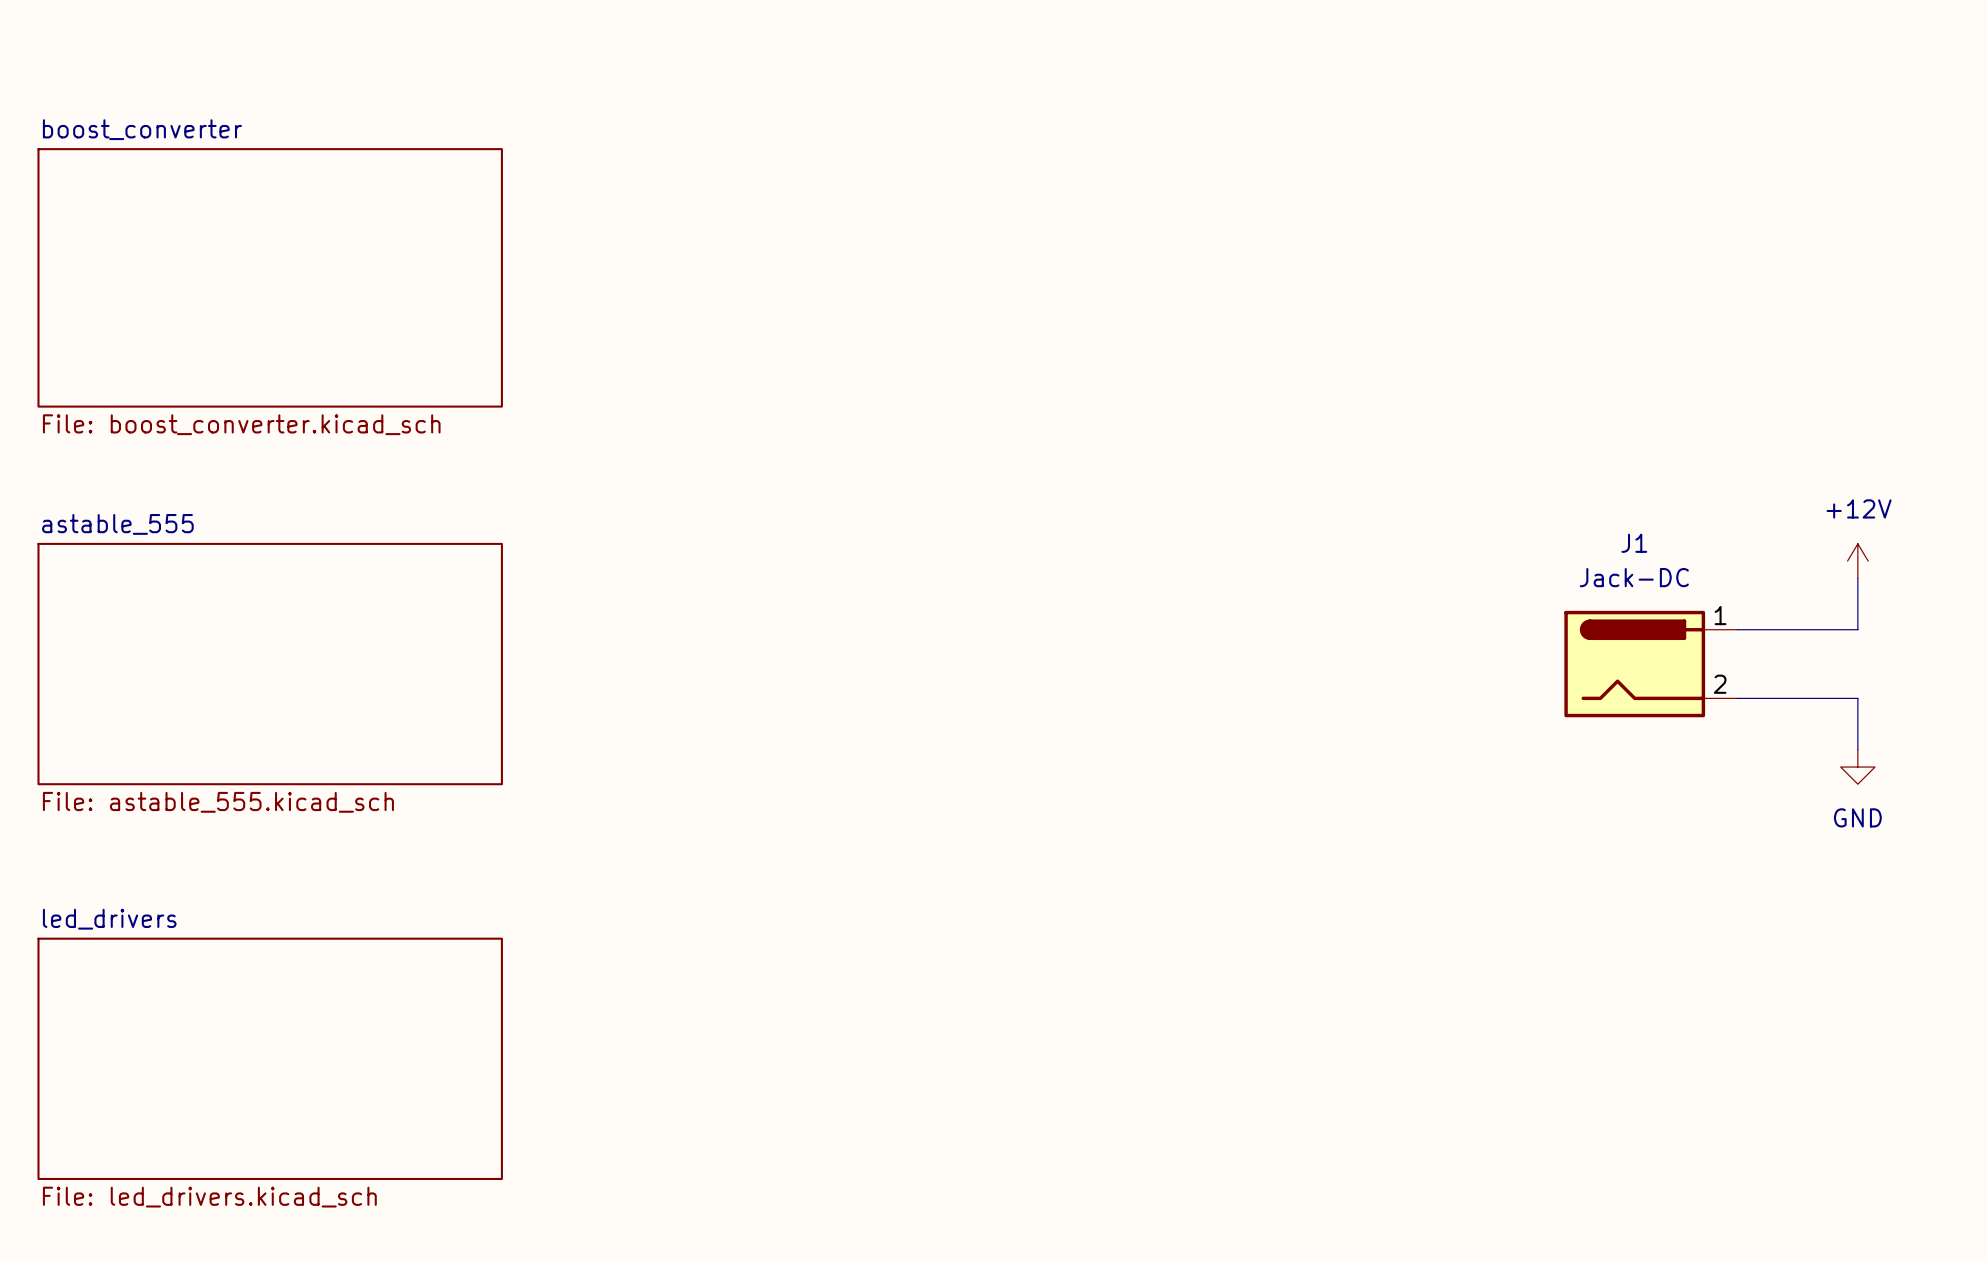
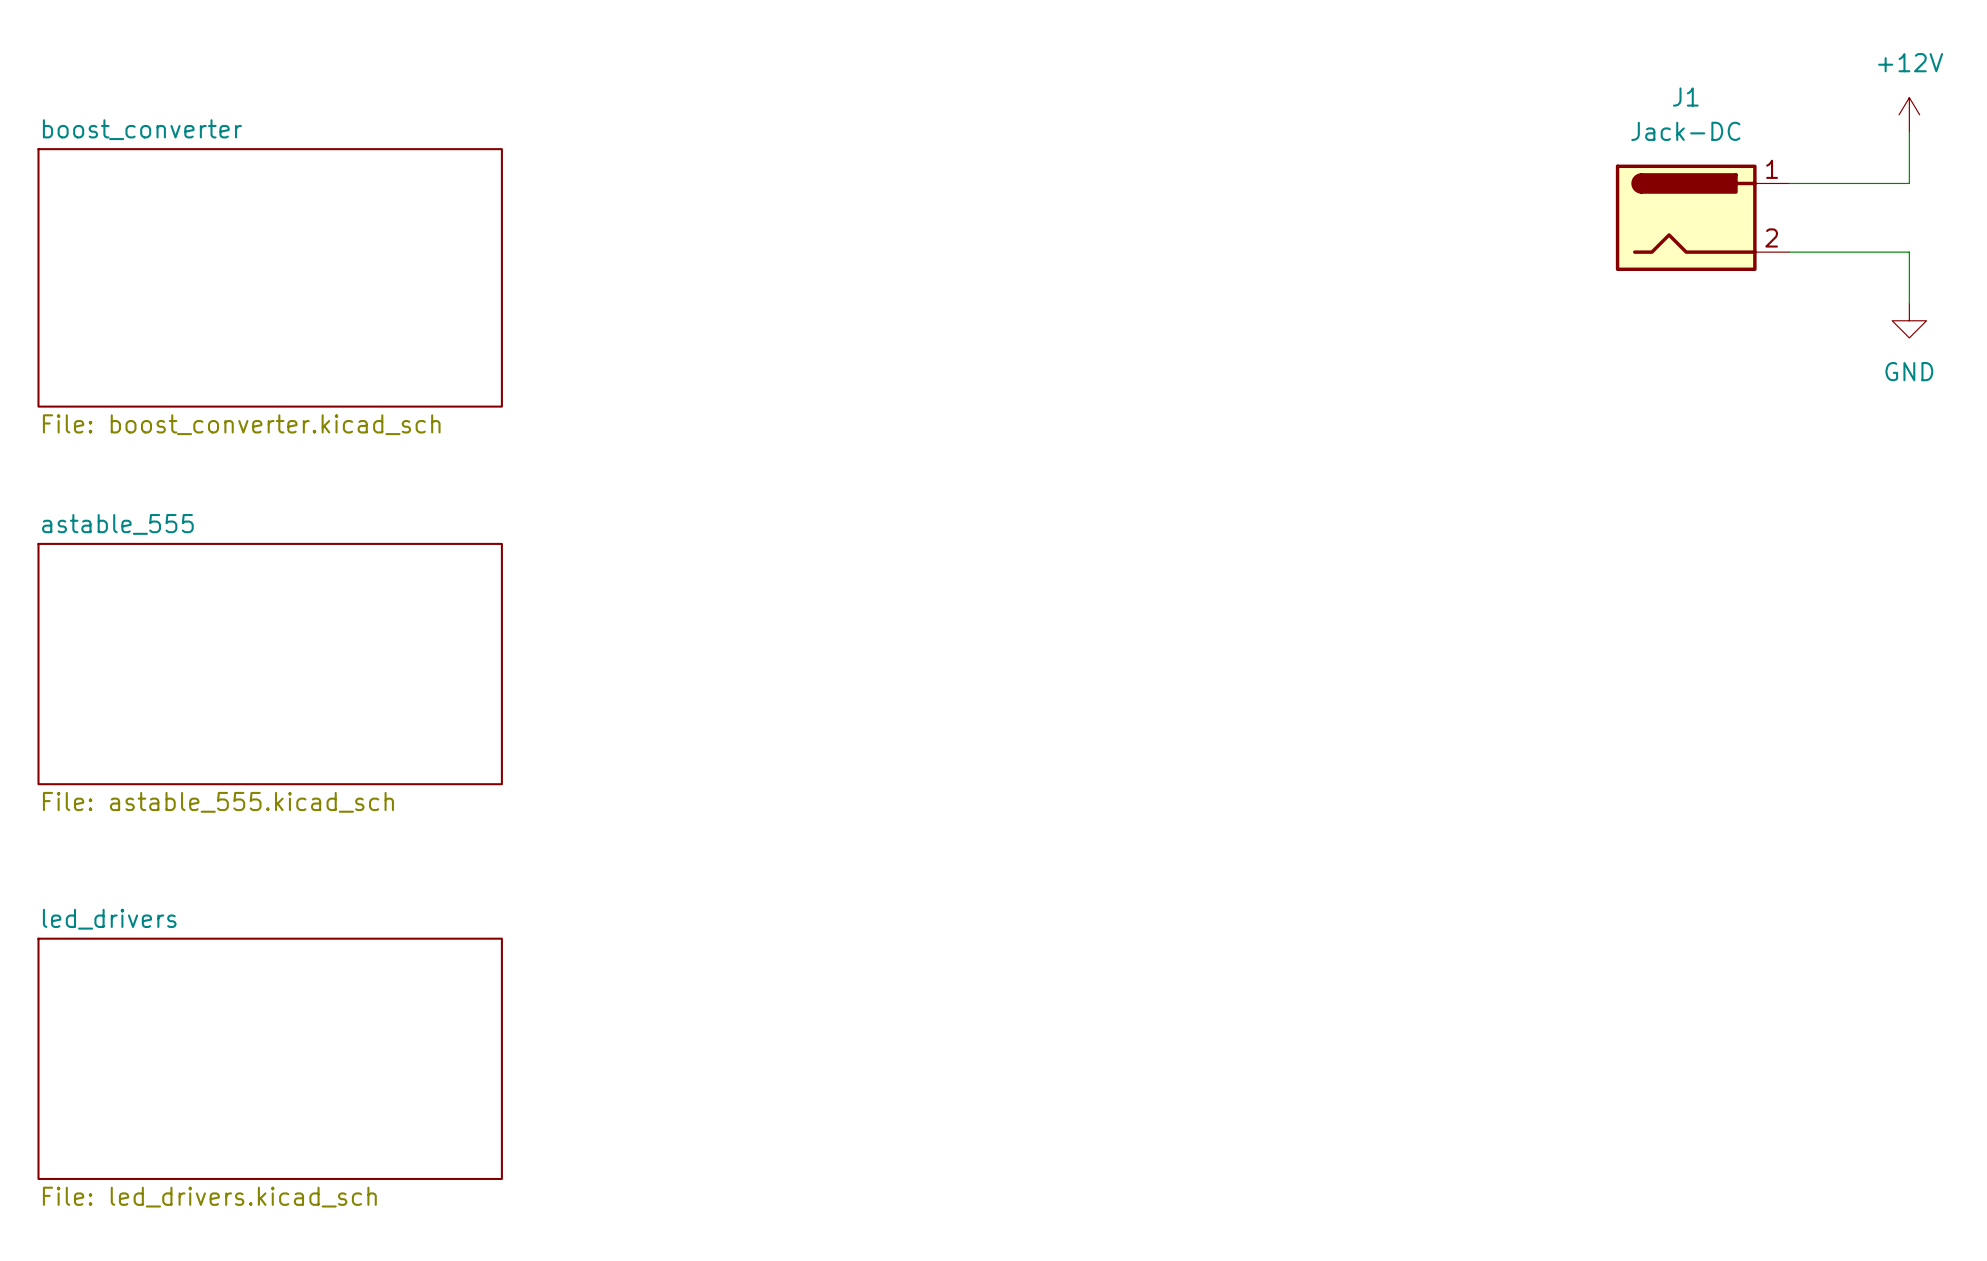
power symbol: none -> +12V (1909, 114)
wire: none -> (1909, 131) (1909, 183) (1789, 183)
wire: none -> (1789, 252) (1909, 252) (1909, 303)
power symbol: none -> GND (1909, 320)
power symbol: +12V (1857, 561) -> none
wire: (1857, 578) (1857, 629) (1737, 629) -> none
J1 position: (1651, 664) -> (1702, 217)
wire: (1737, 698) (1857, 698) (1857, 749) -> none
power symbol: GND (1857, 767) -> none

